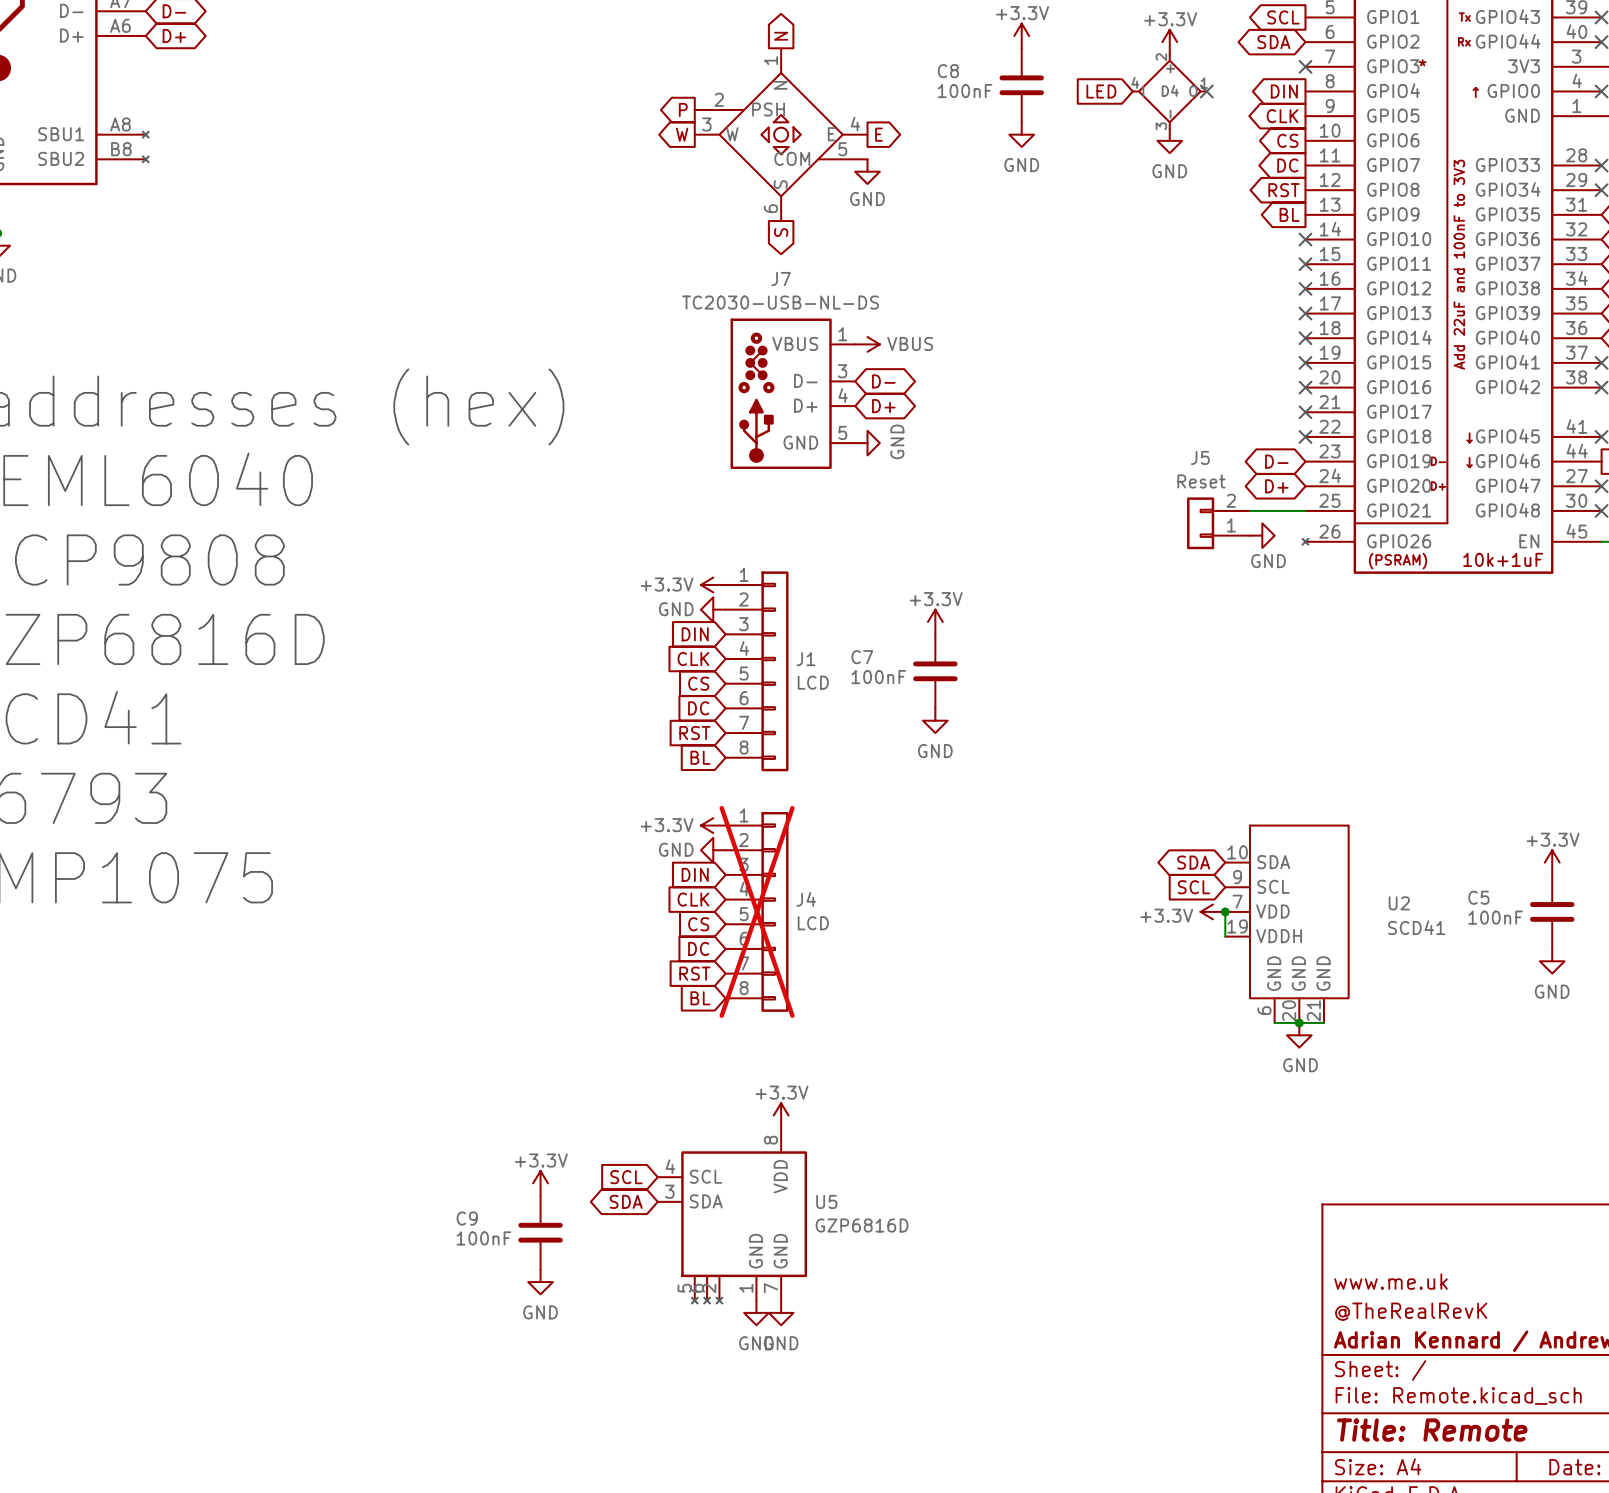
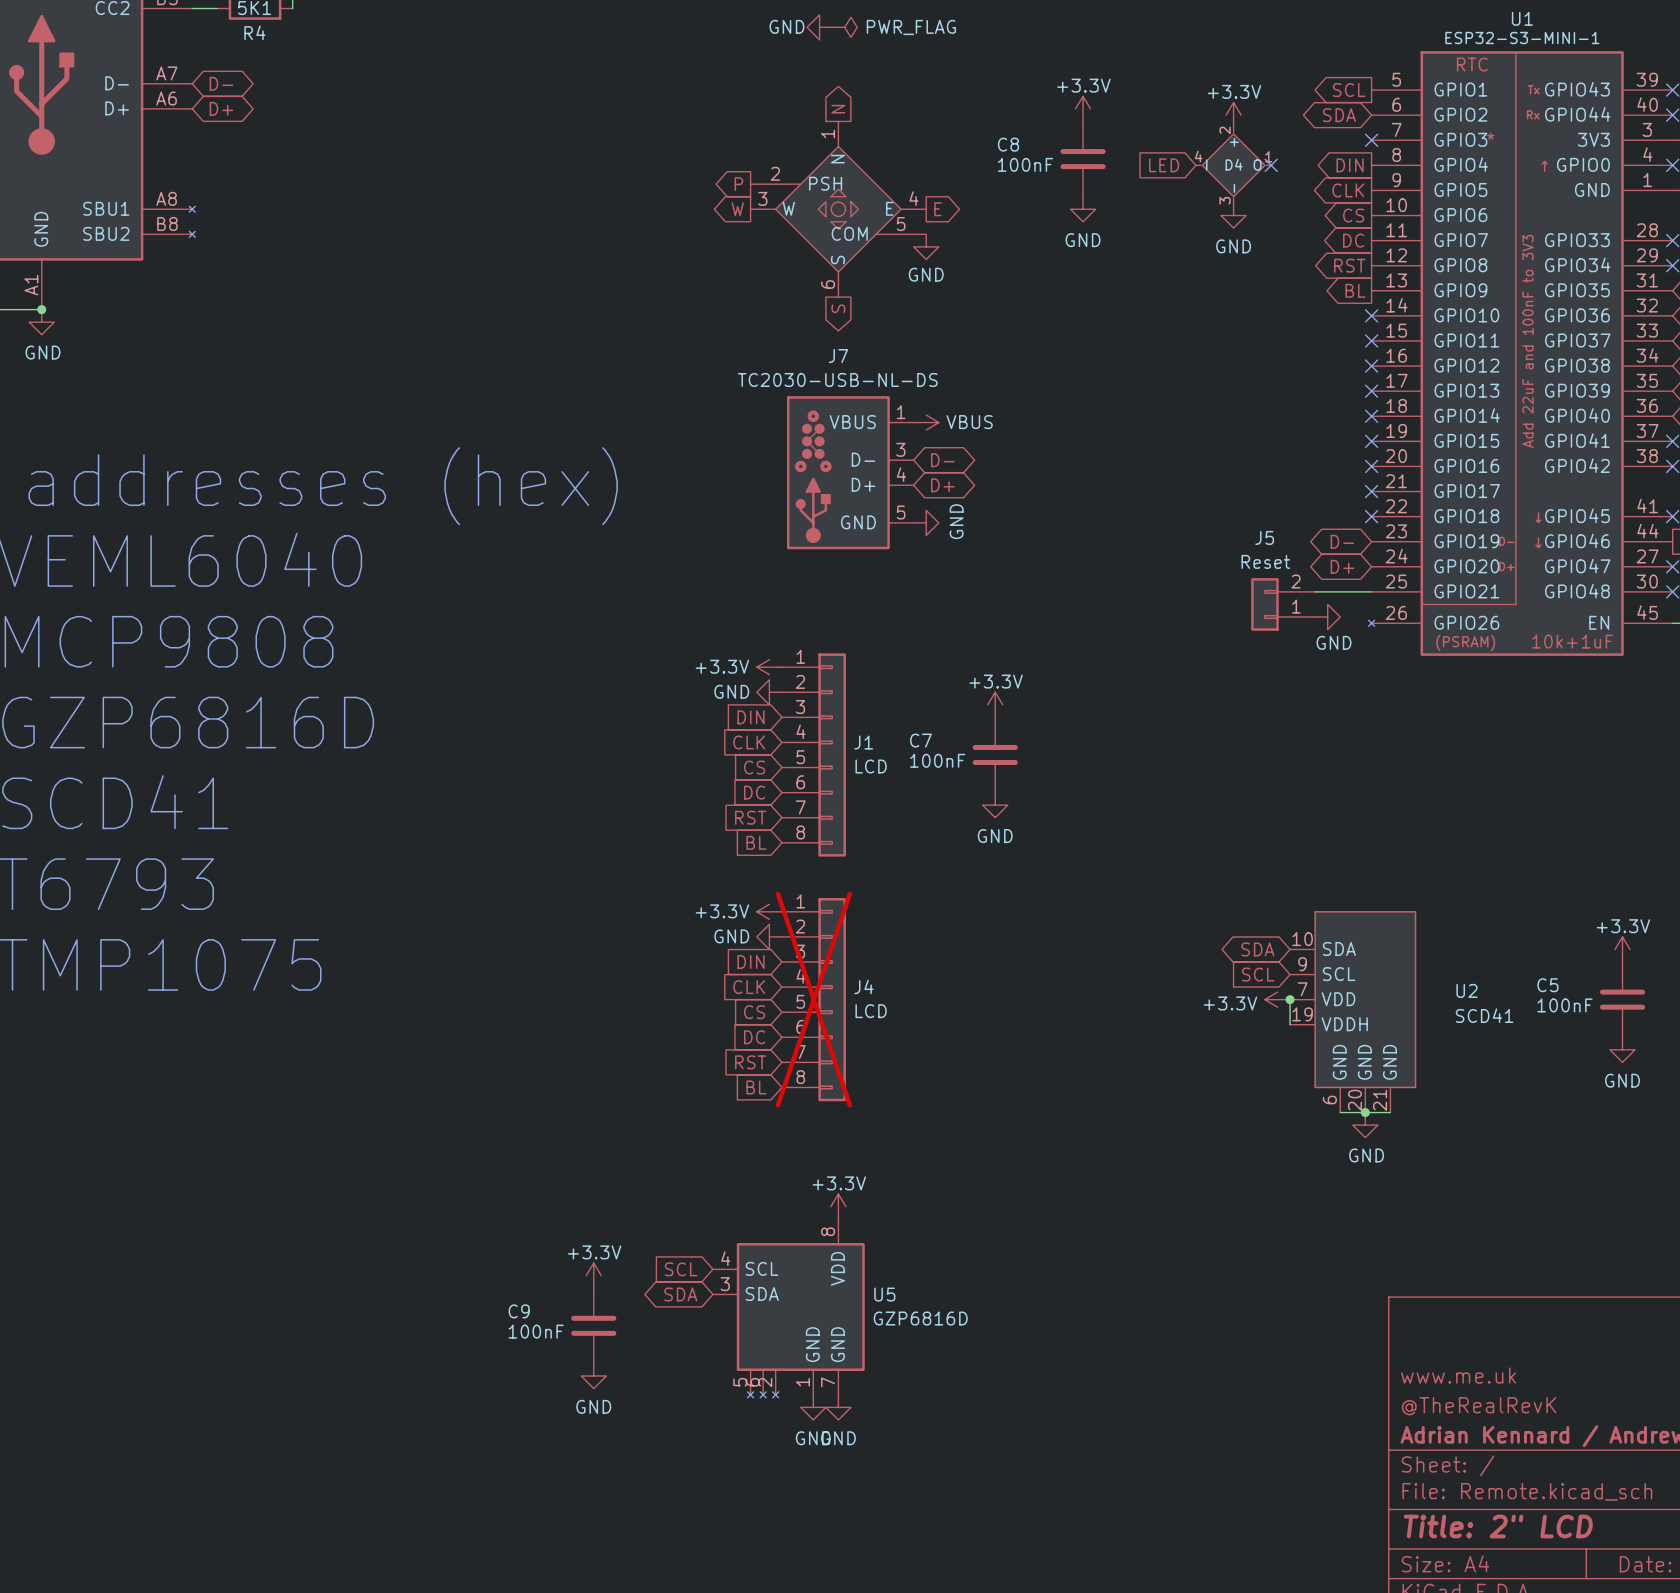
title block: Title: Remote (1432, 1430) -> Title: 2" LCD (1498, 1526)

